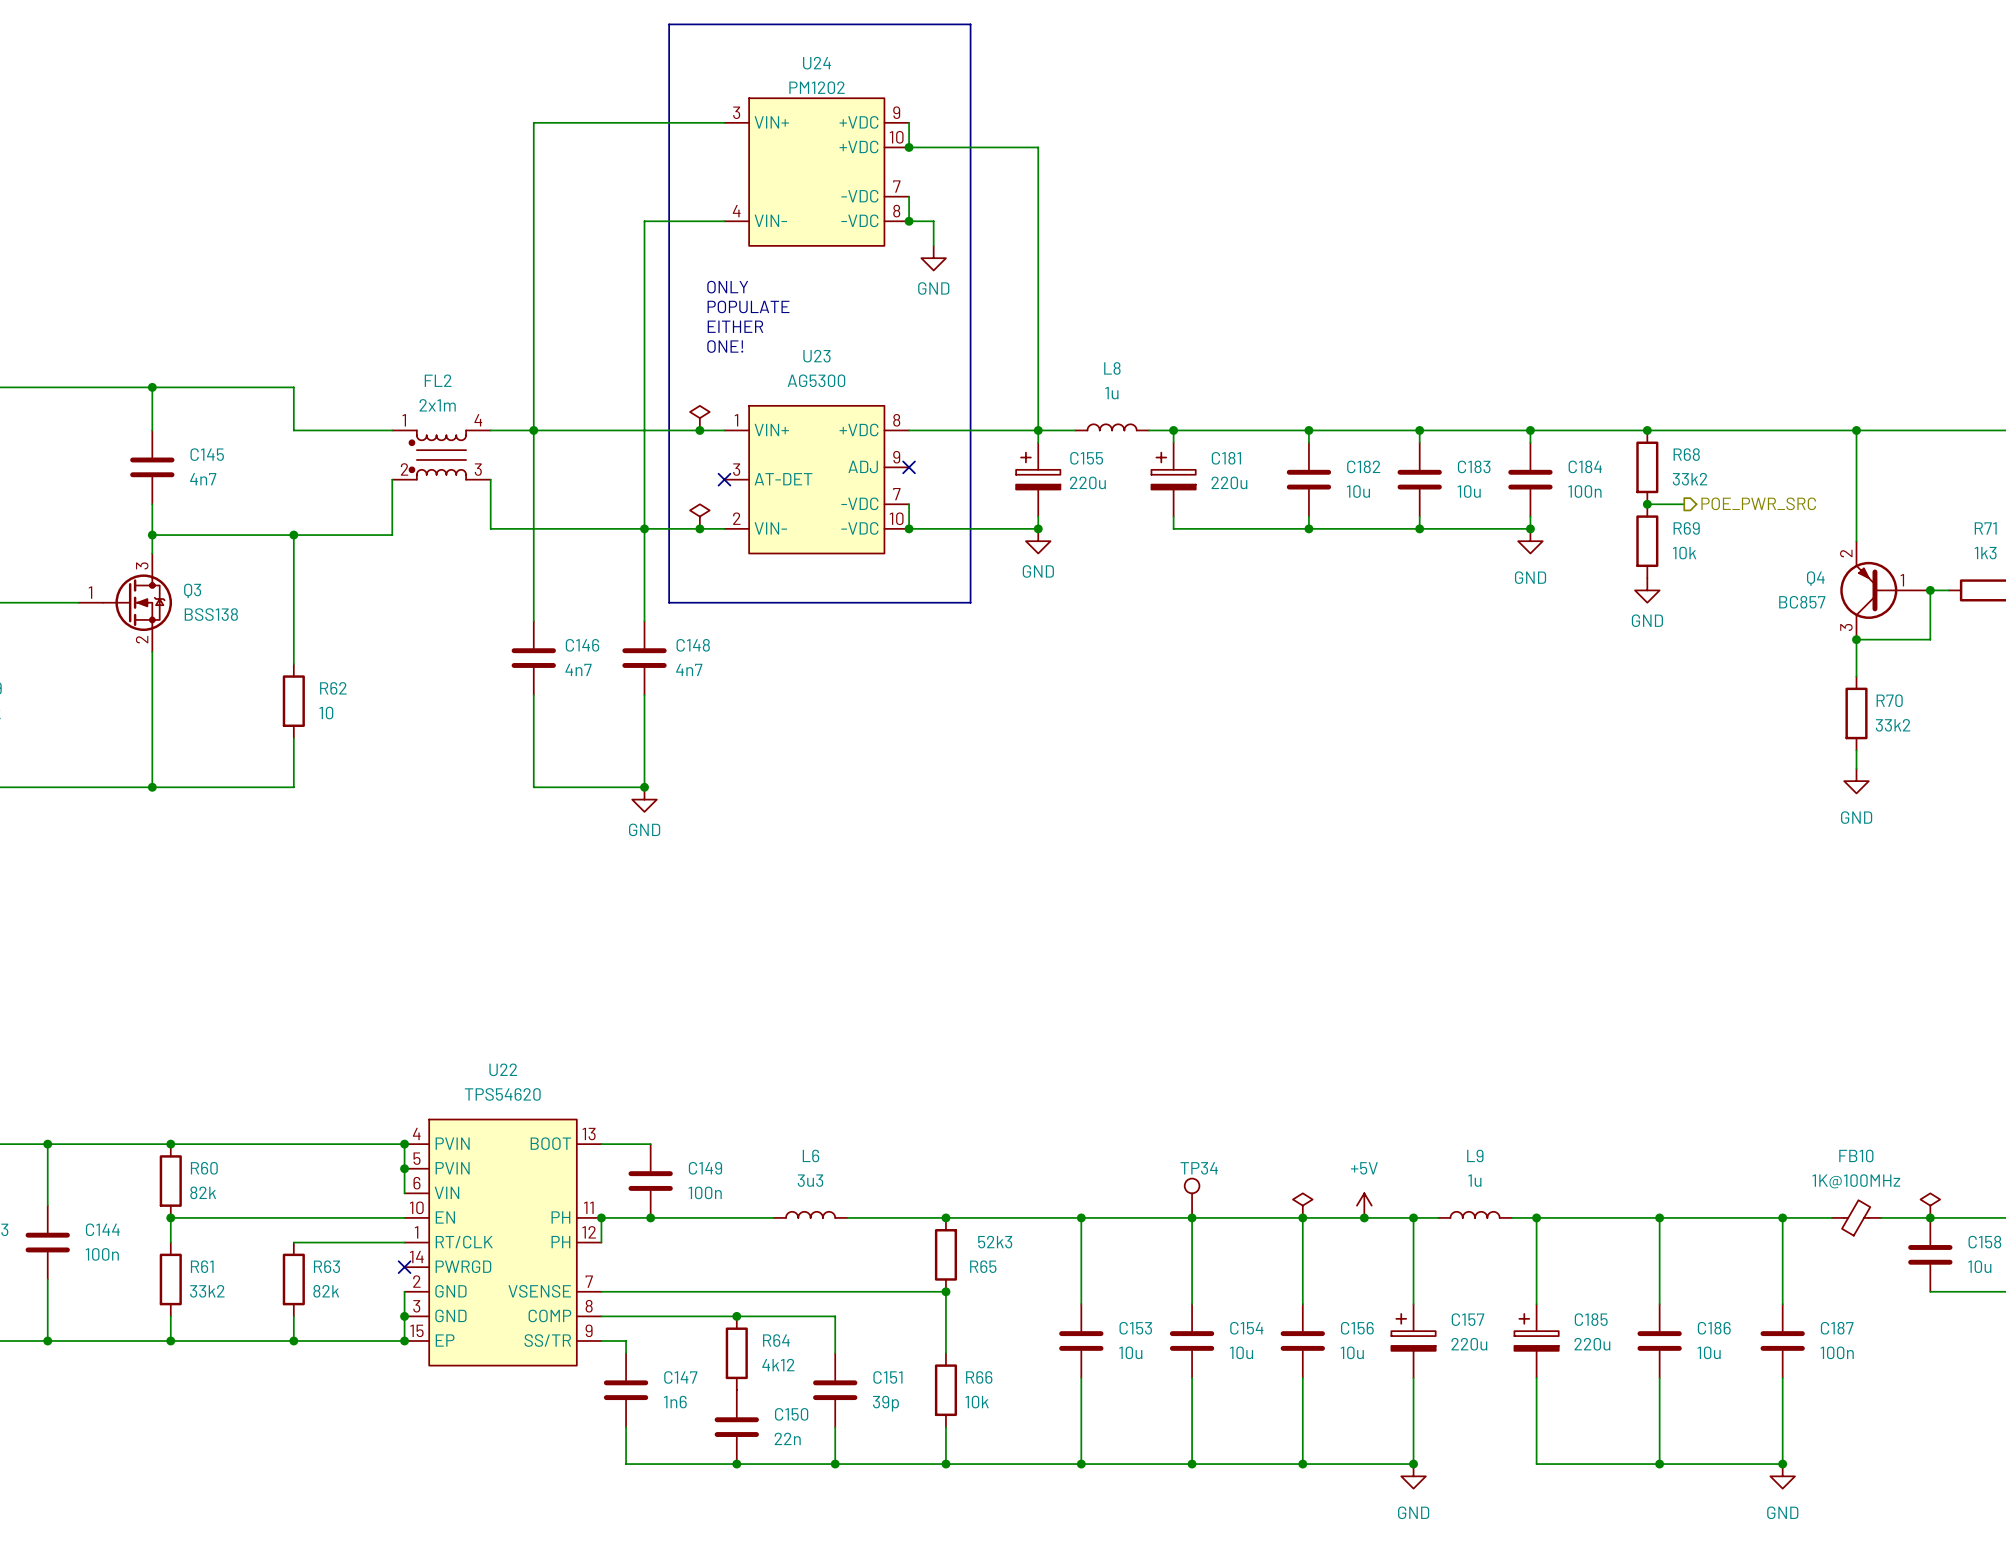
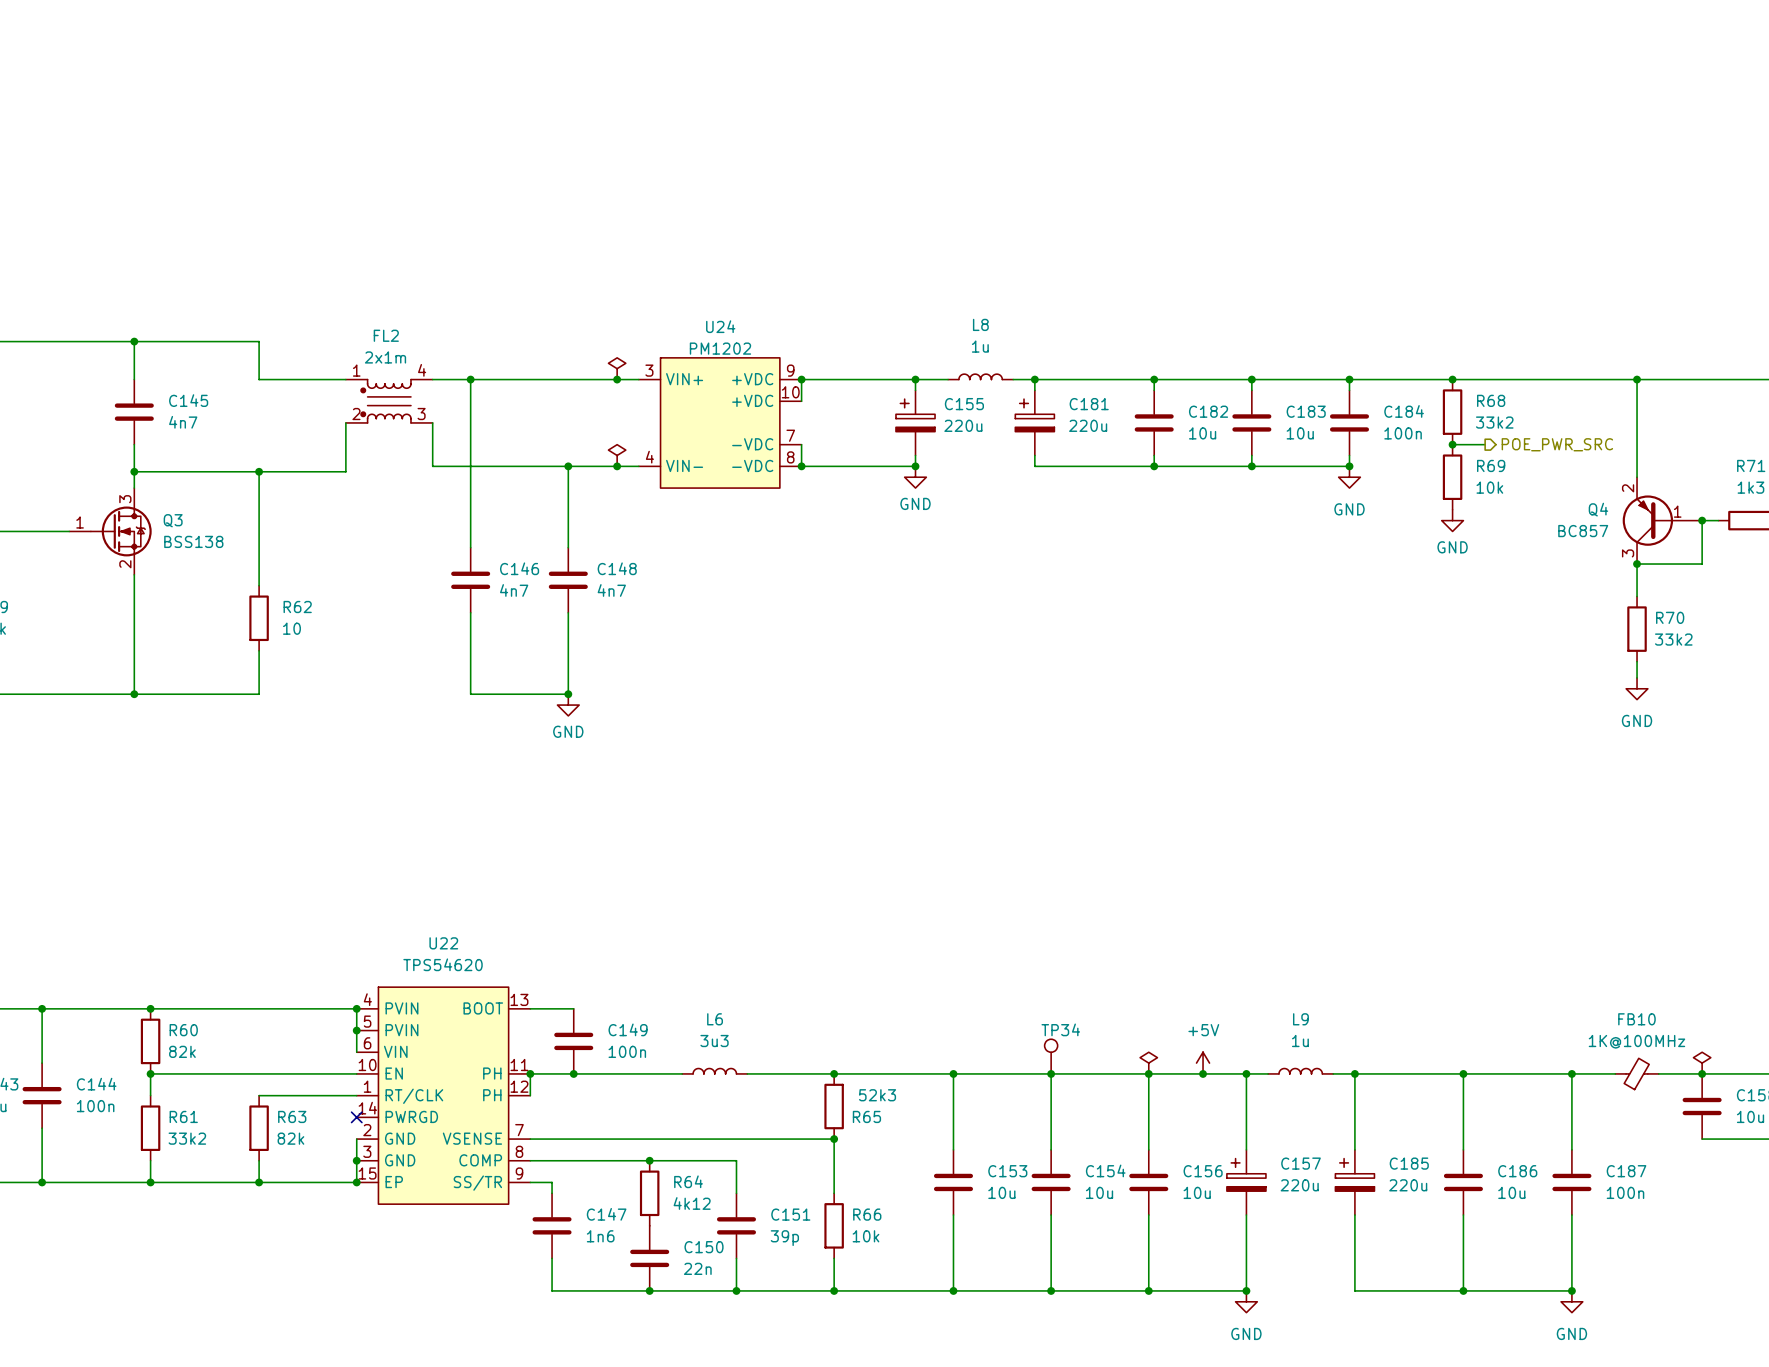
line: (669, 24) (970, 24) (970, 602) (669, 602) (669, 24) -> none
wire: (724, 122) (533, 122) (533, 430) -> none
wire: (909, 122) (909, 147) (1038, 147) (1038, 430) -> none
junction: (909, 147) -> none
U24 position: (816, 172) -> (720, 422)
wire: (909, 196) (909, 221) (933, 221) (933, 245) -> none
wire: (724, 221) (644, 221) (644, 528) -> none
junction: (909, 221) -> none
power symbol: GND (933, 258) -> none
text: ONLY (727, 287) -> none
text: POPULATE (748, 306) -> none
text: EITHER (735, 326) -> none
text: ONE! (725, 346) -> none
wire: none -> (801, 379) (801, 401)
junction: none -> (801, 379)
no-connect mark: (909, 467) -> none
no-connect mark: (724, 479) -> none
U23: AG5300 (816, 479) -> none

